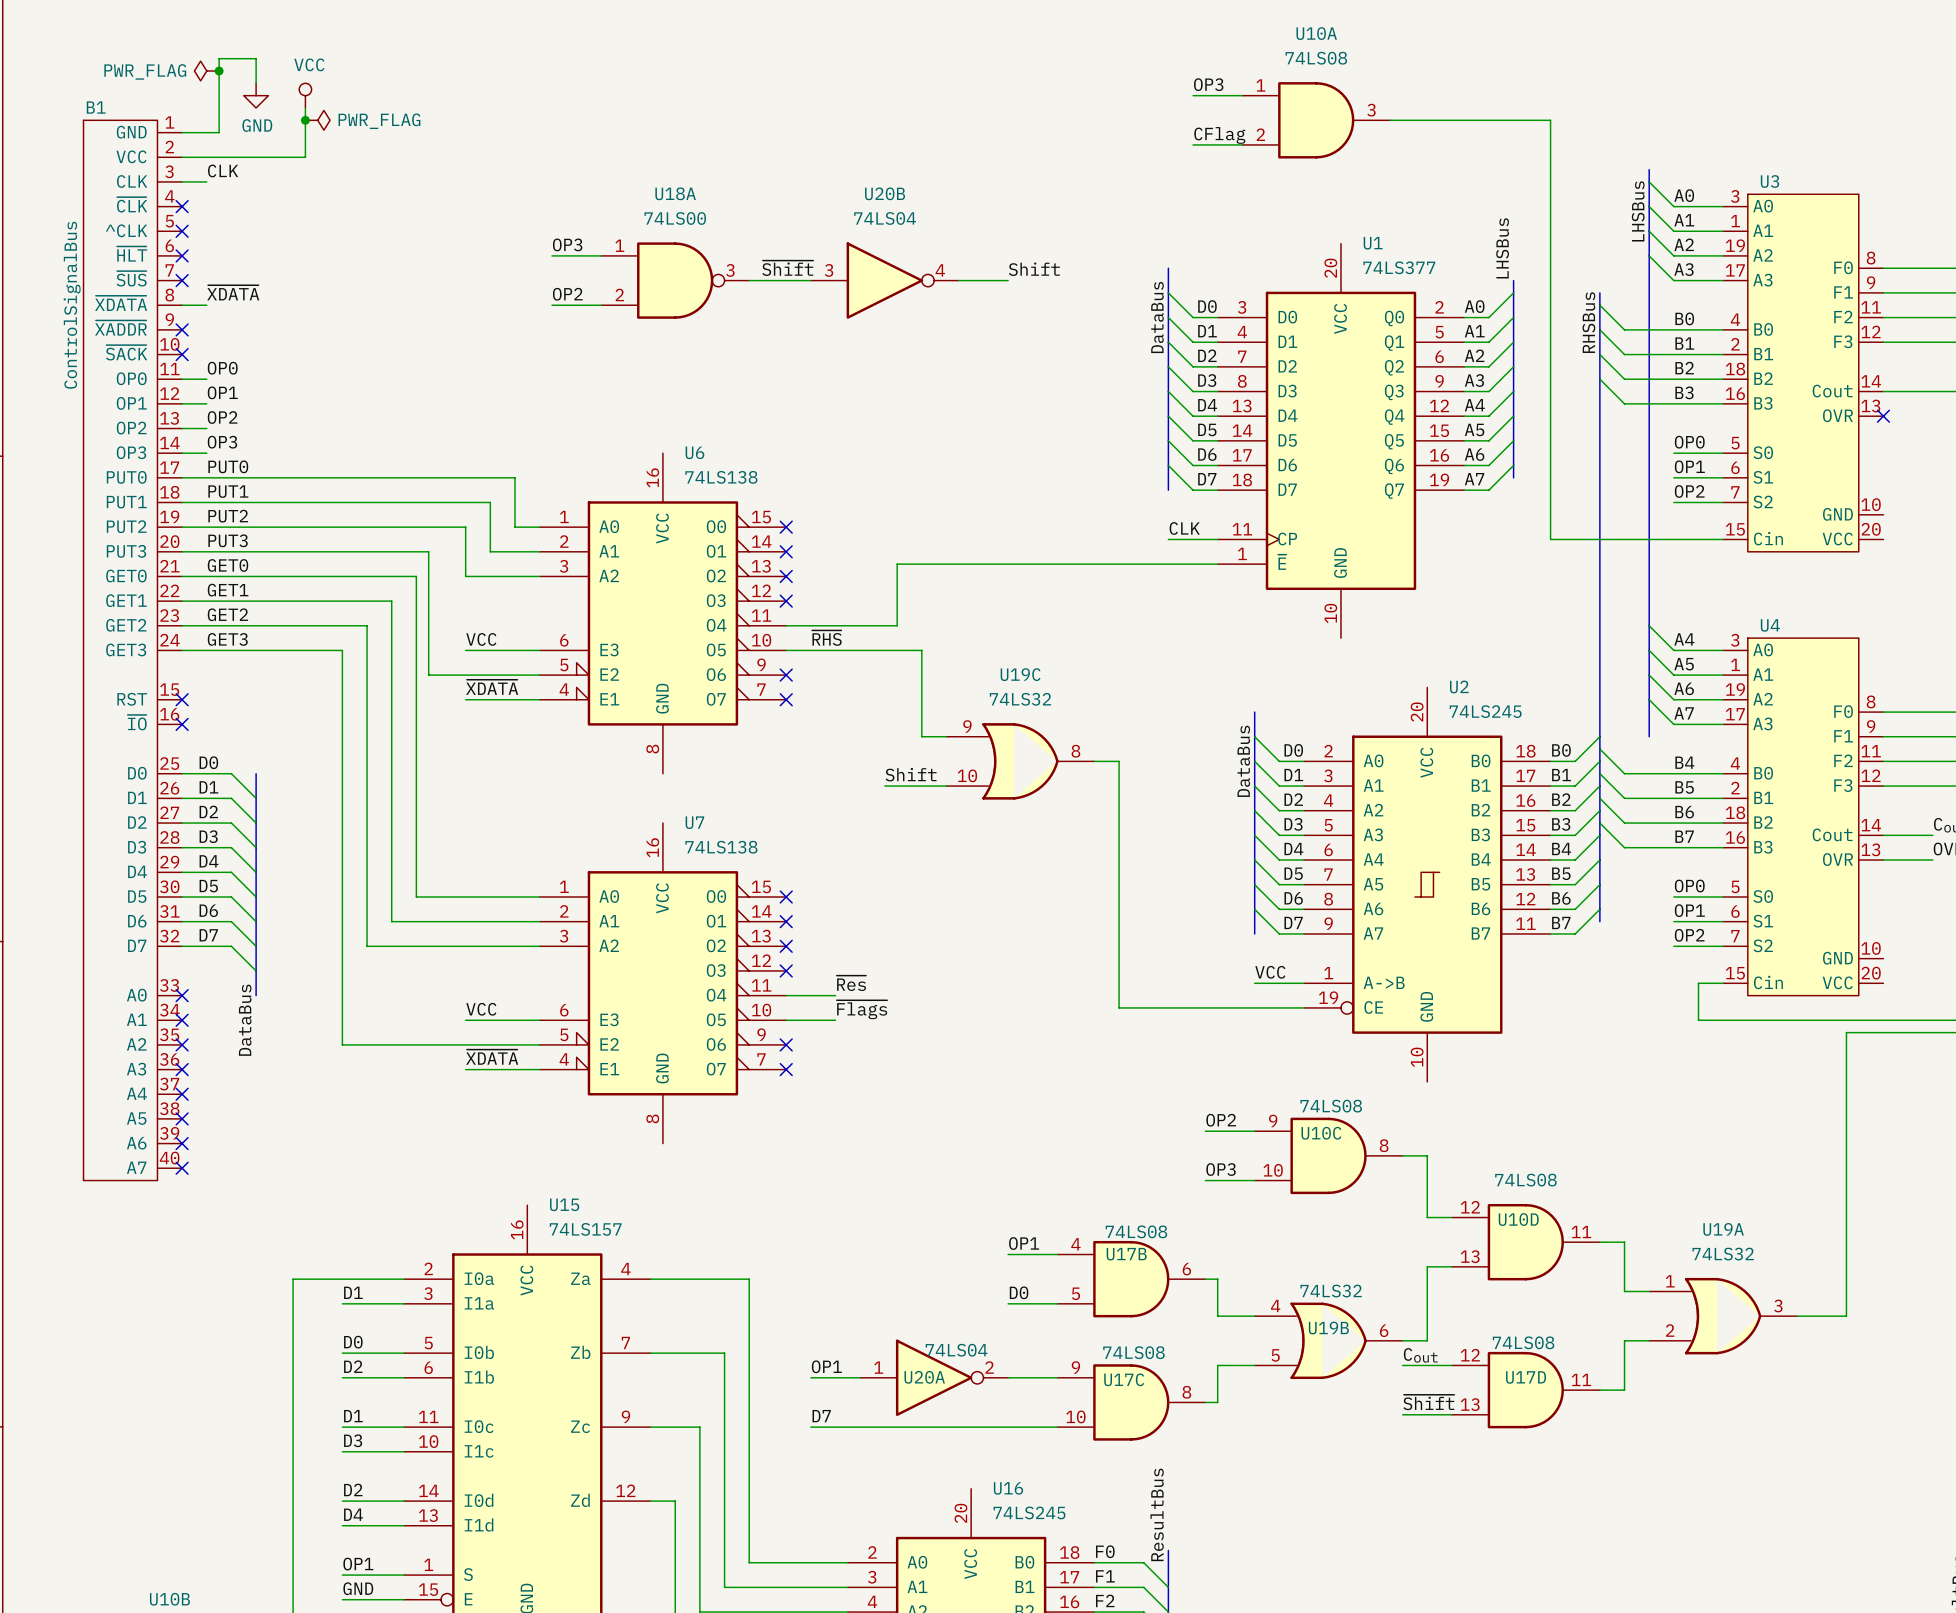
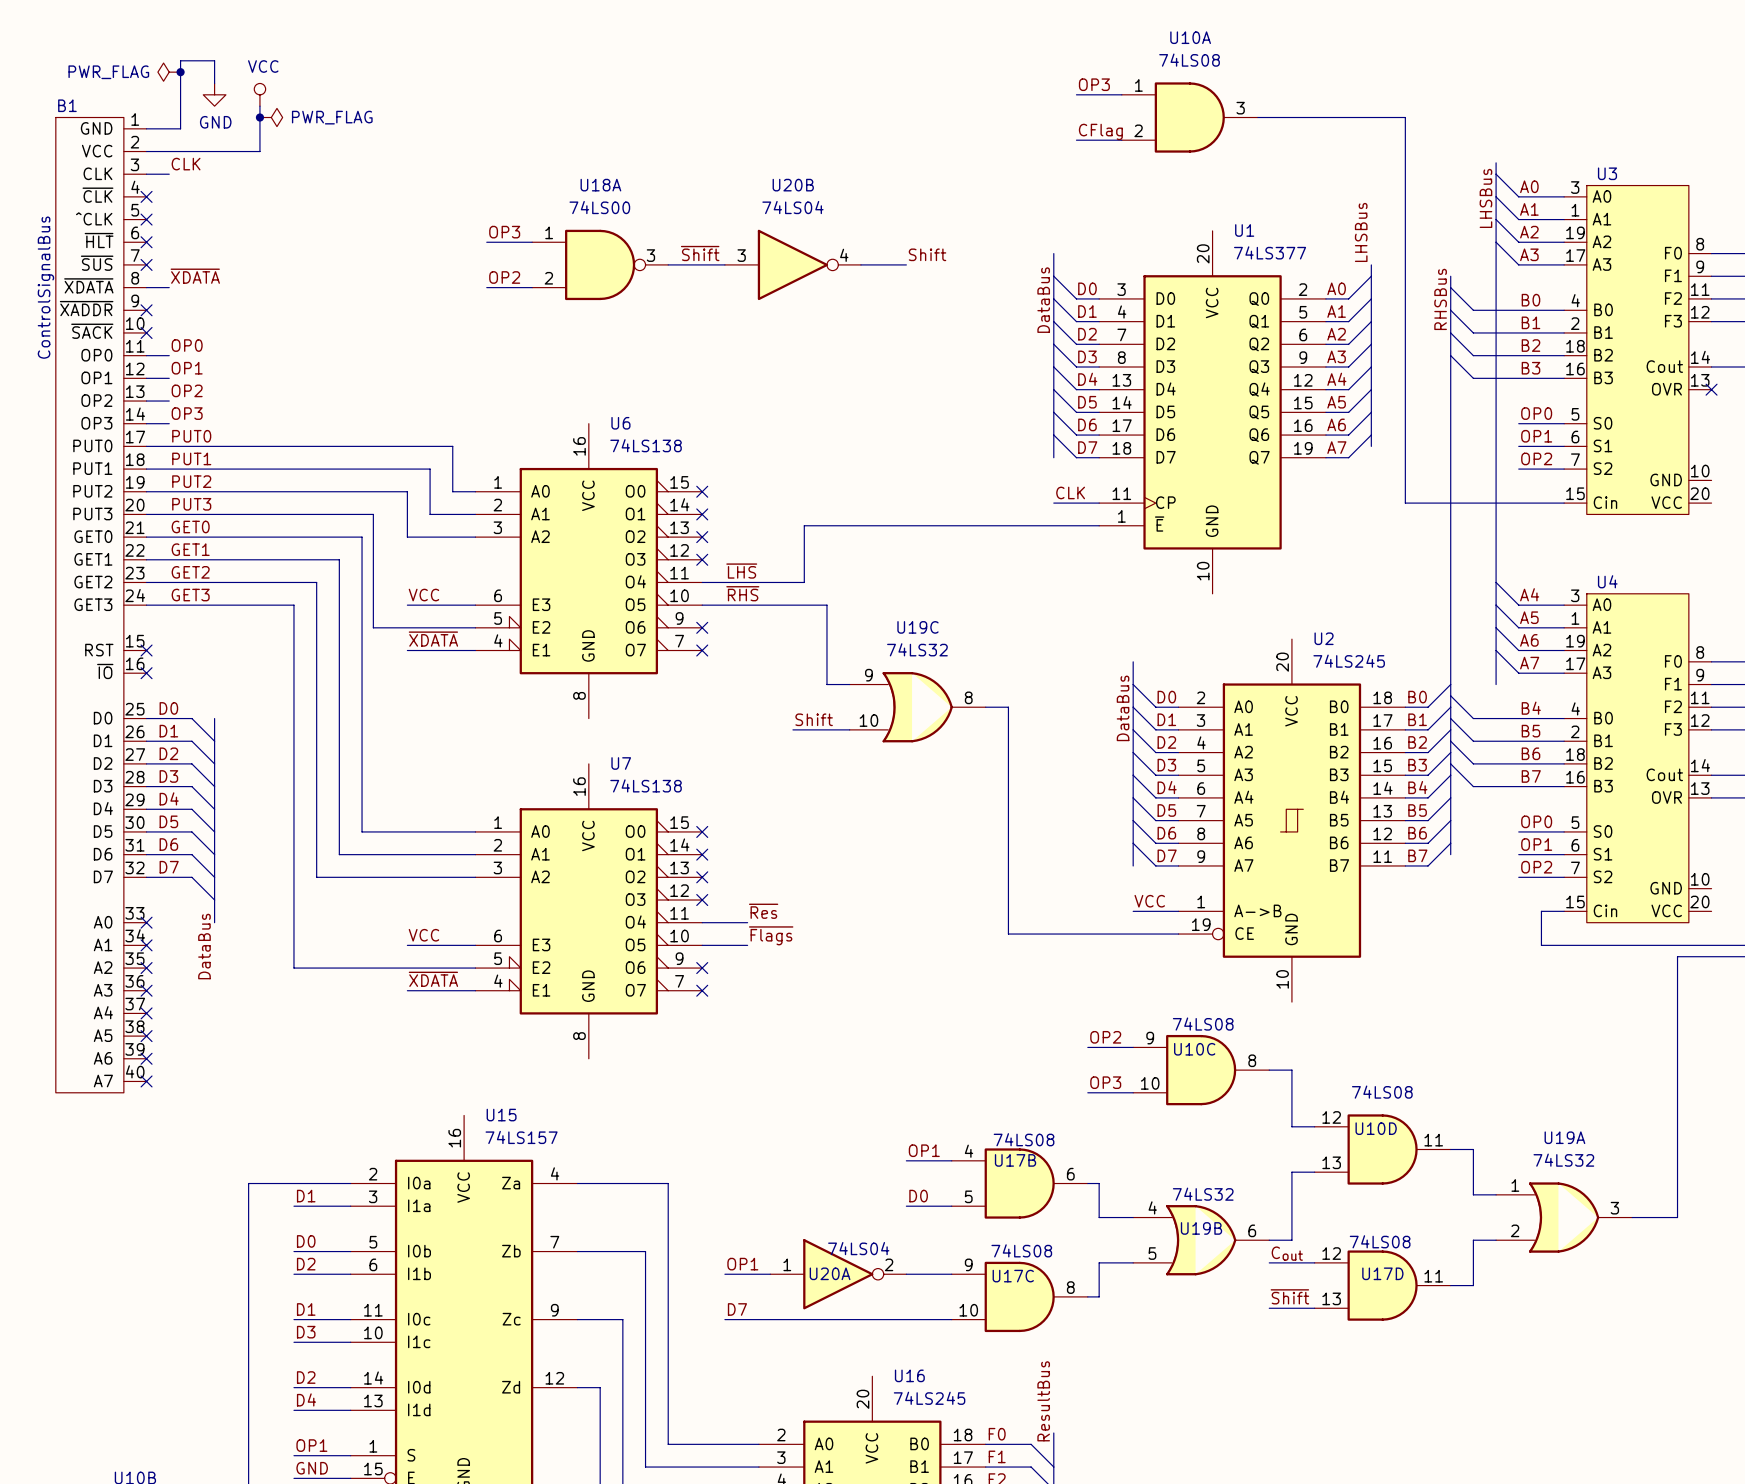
label: none -> ~{LHS} (741, 571)

